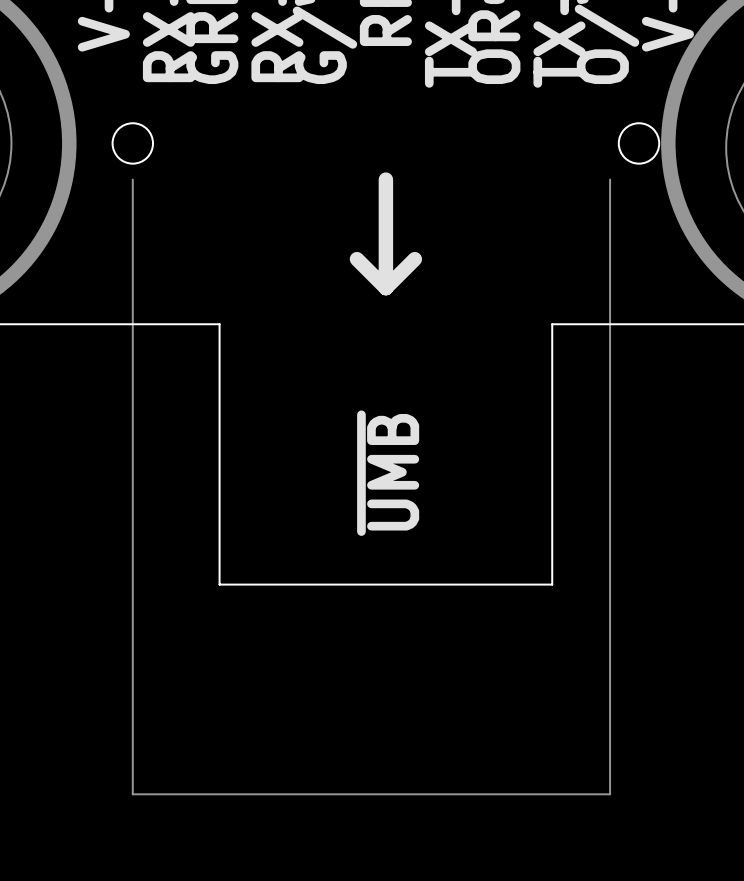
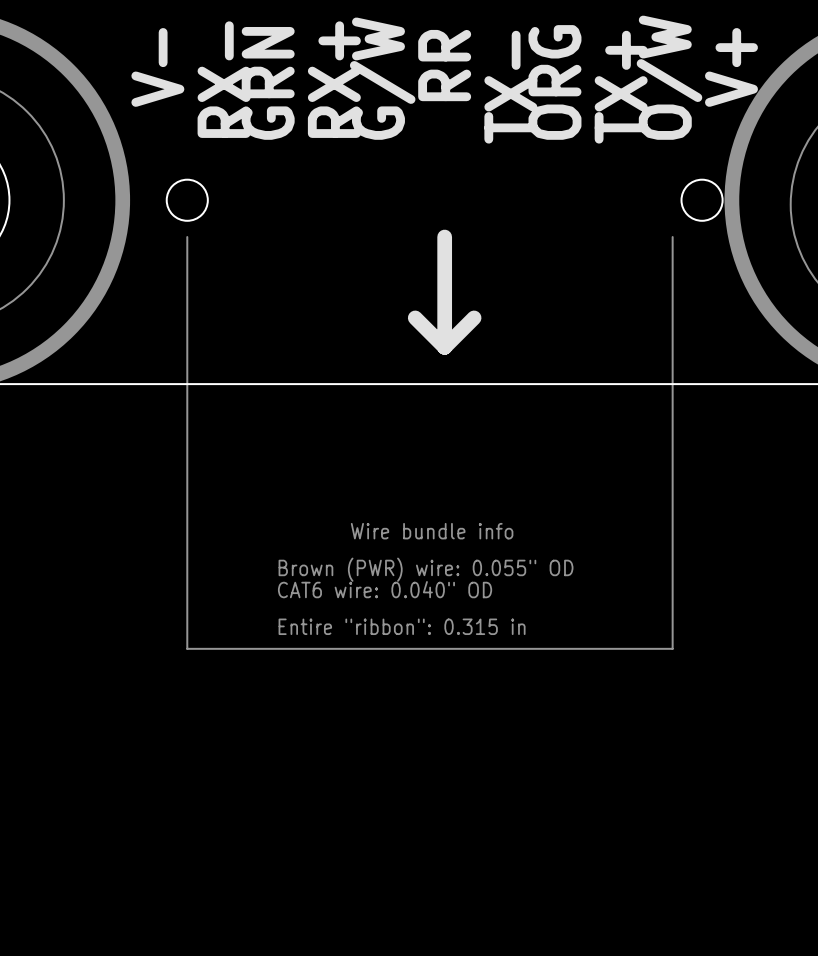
board edge: (219, 324) (219, 584) (552, 584) (552, 324) -> (275, 384) (613, 384)
text: none -> Wire bundle info (432, 531)
text: ~{UMB} (388, 473) -> none
text: none -> Brown (PWR) wire: 0.055" OD (426, 569)
text: none -> CAT6 wire: 0.040" OD (385, 589)
text: none -> Entire "ribbon": 0.315 in (402, 626)
line: (132, 584) (132, 794) (610, 794) (610, 584) -> (187, 648) (672, 648)

